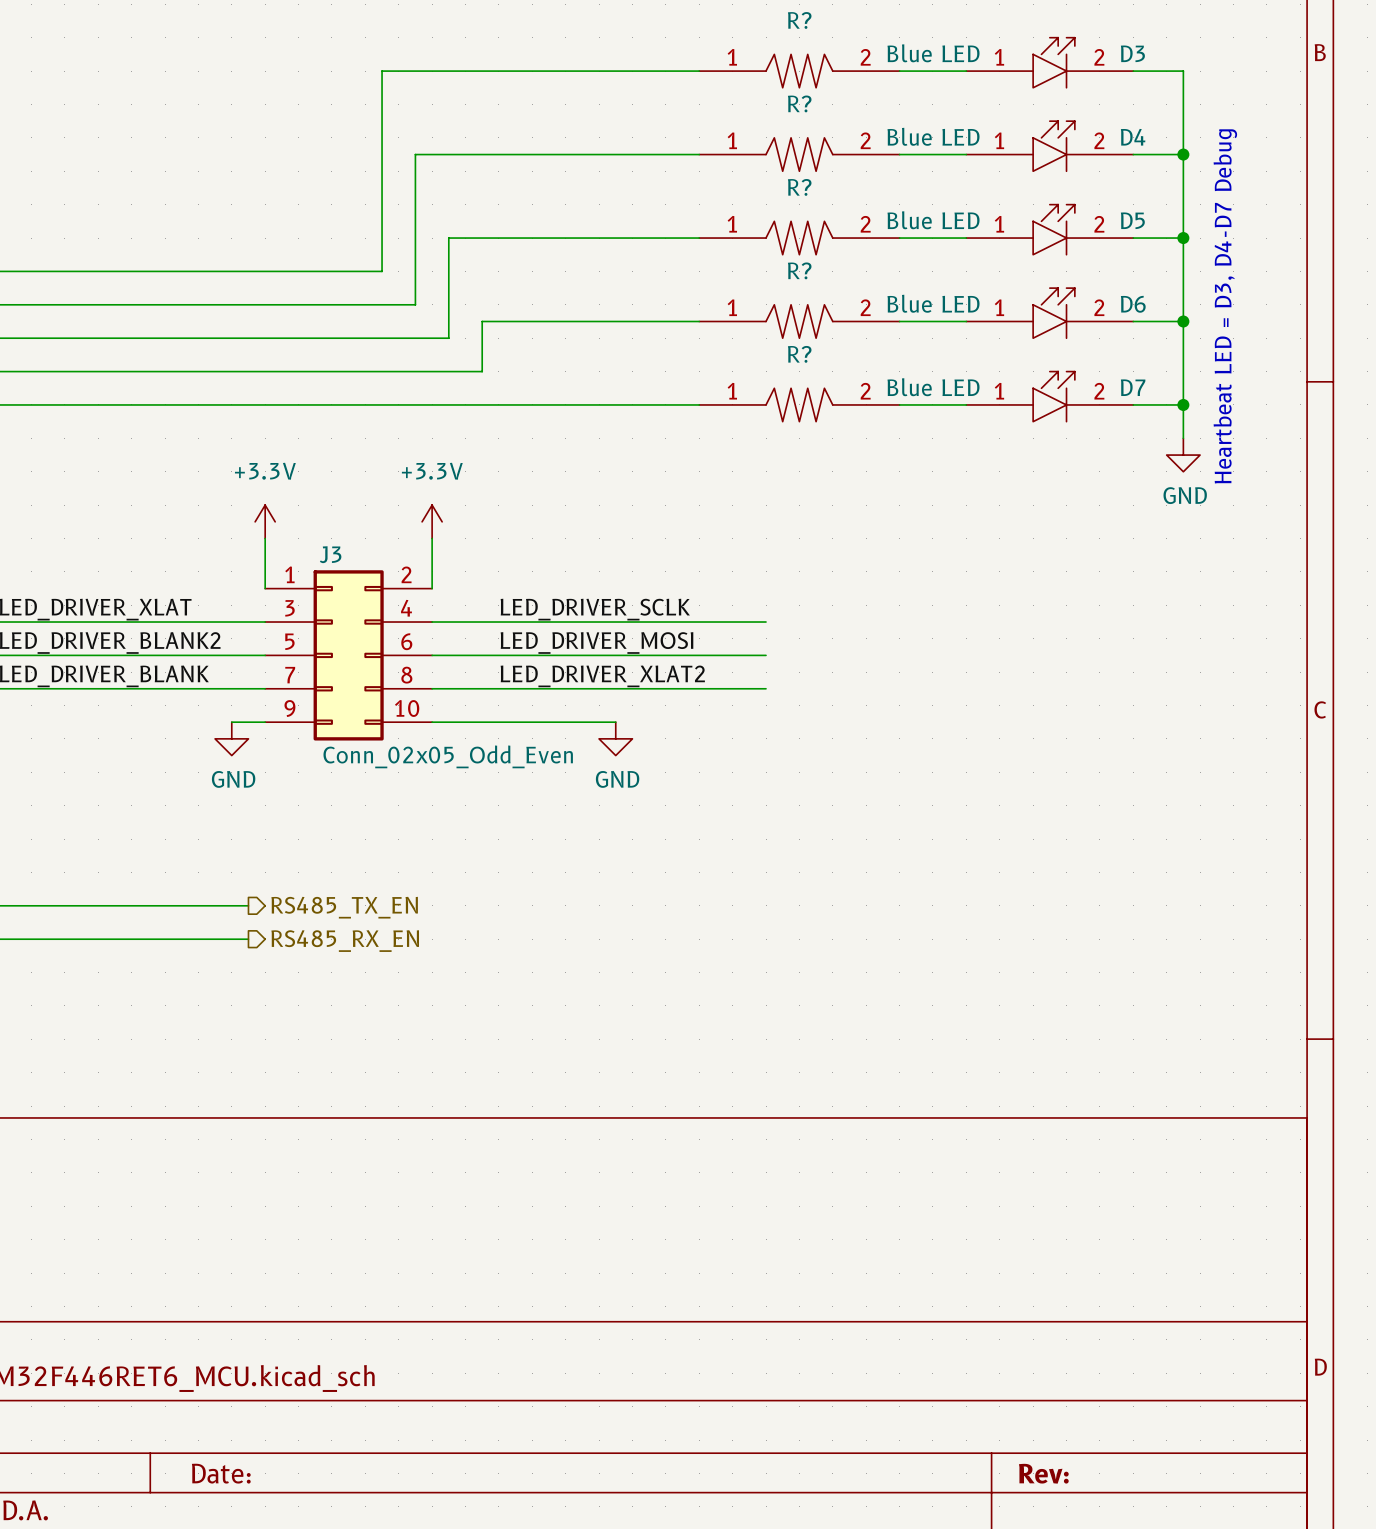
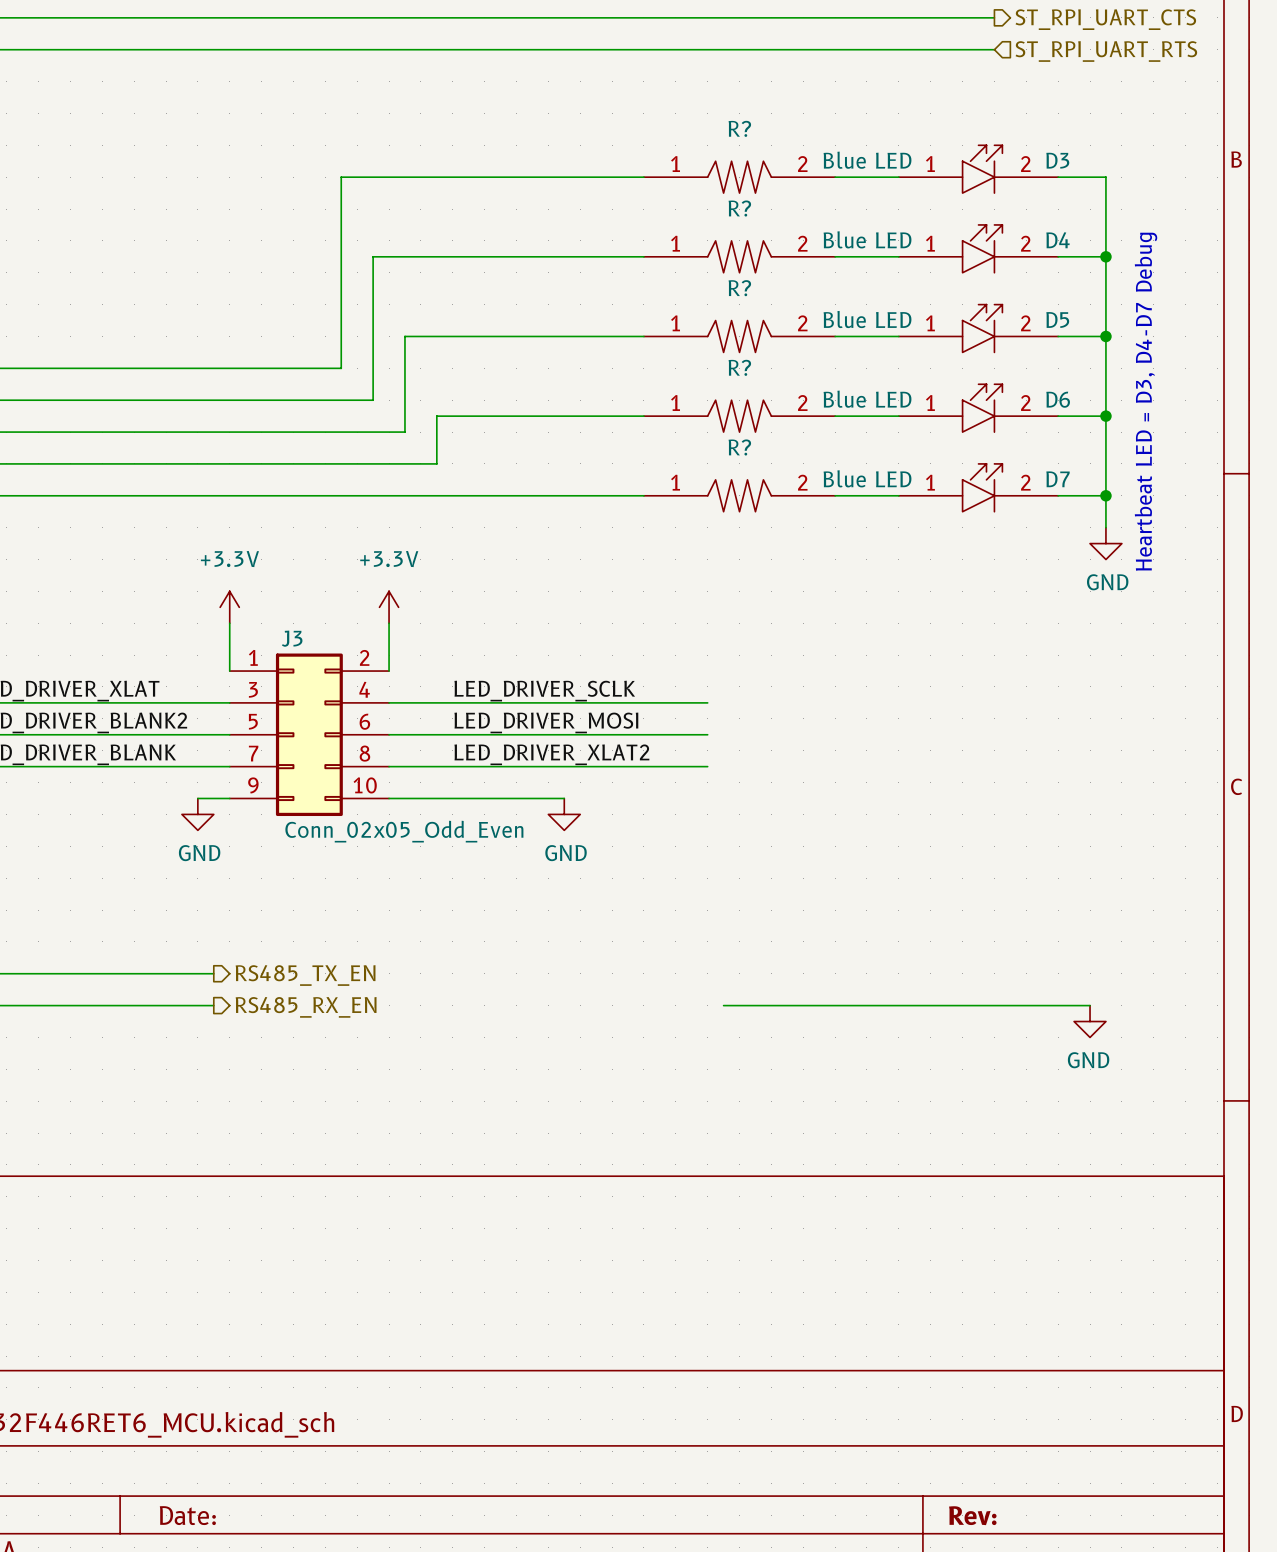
wire: none -> (723, 1005) (1090, 1005)
power symbol: none -> GND (1090, 1021)

